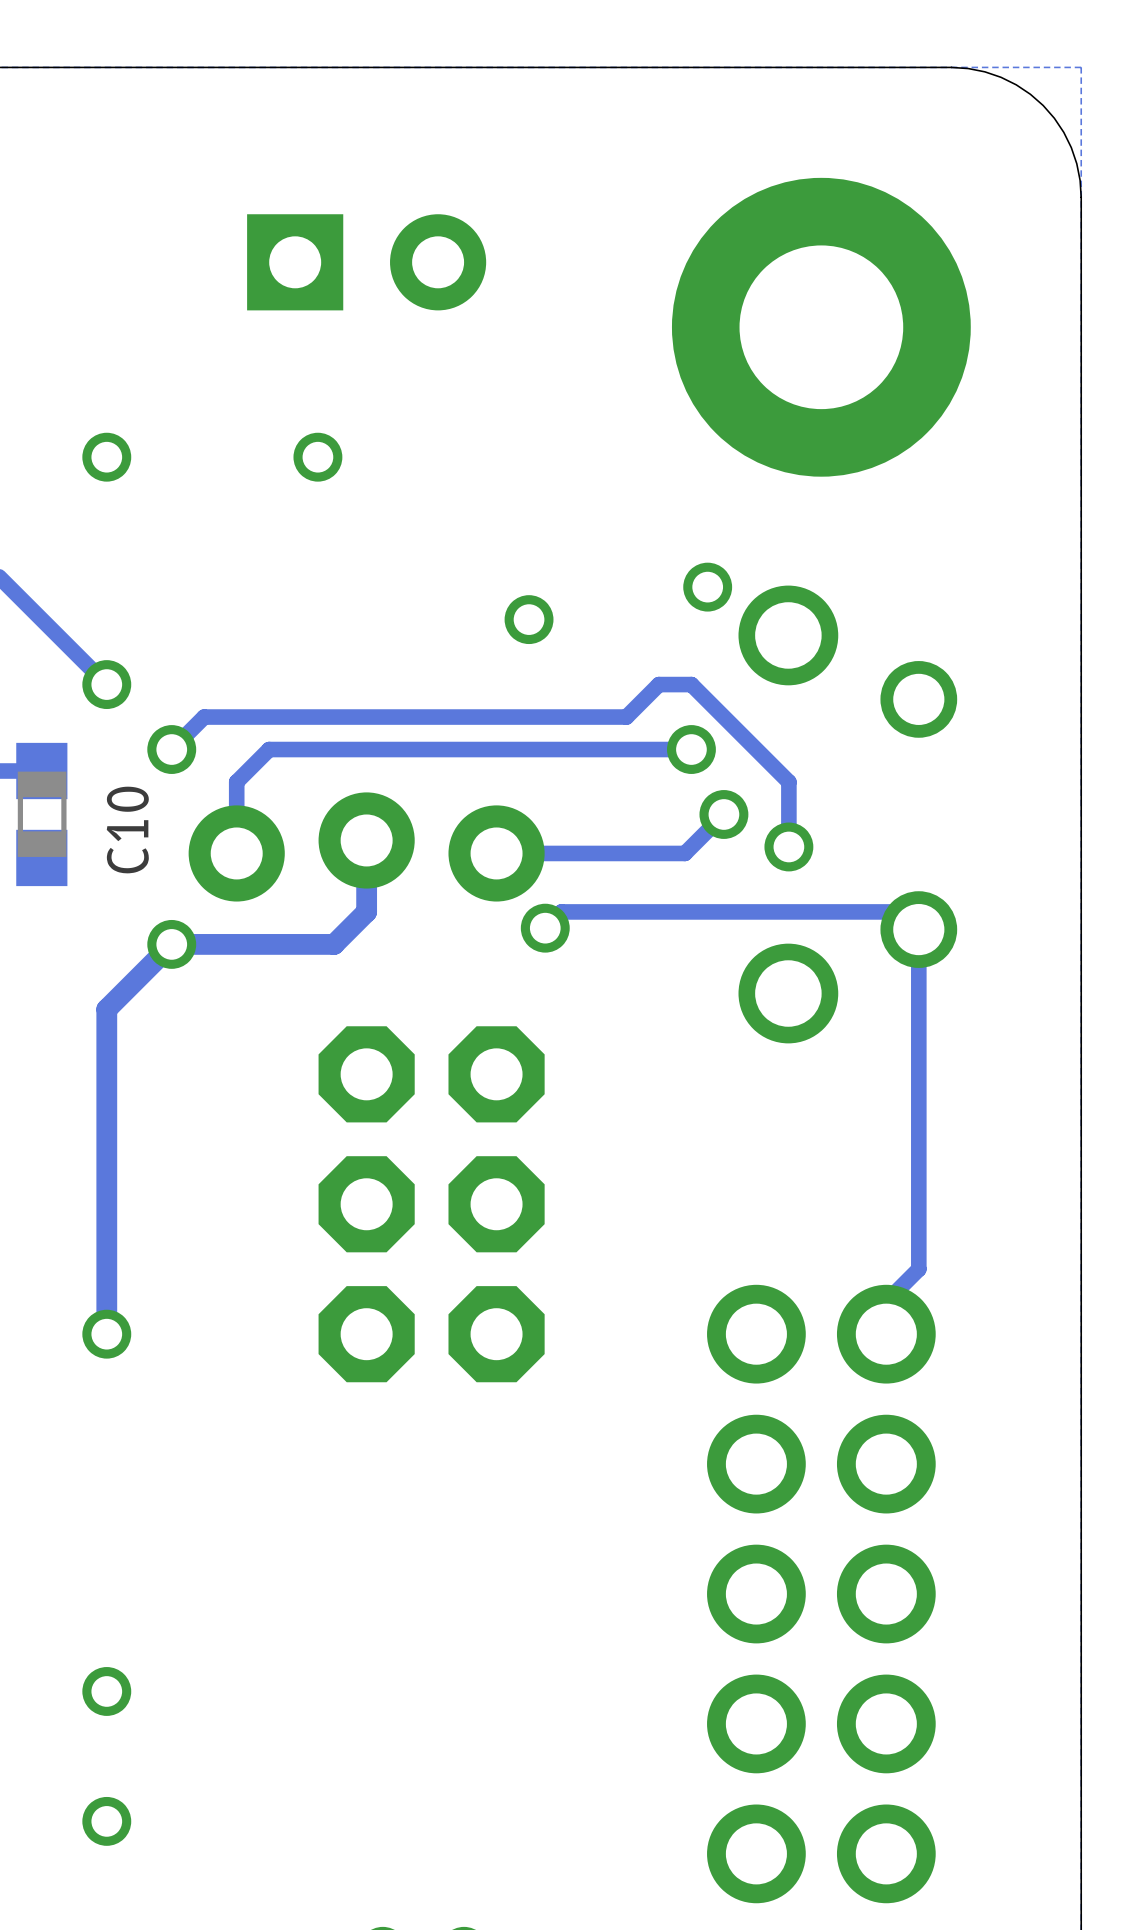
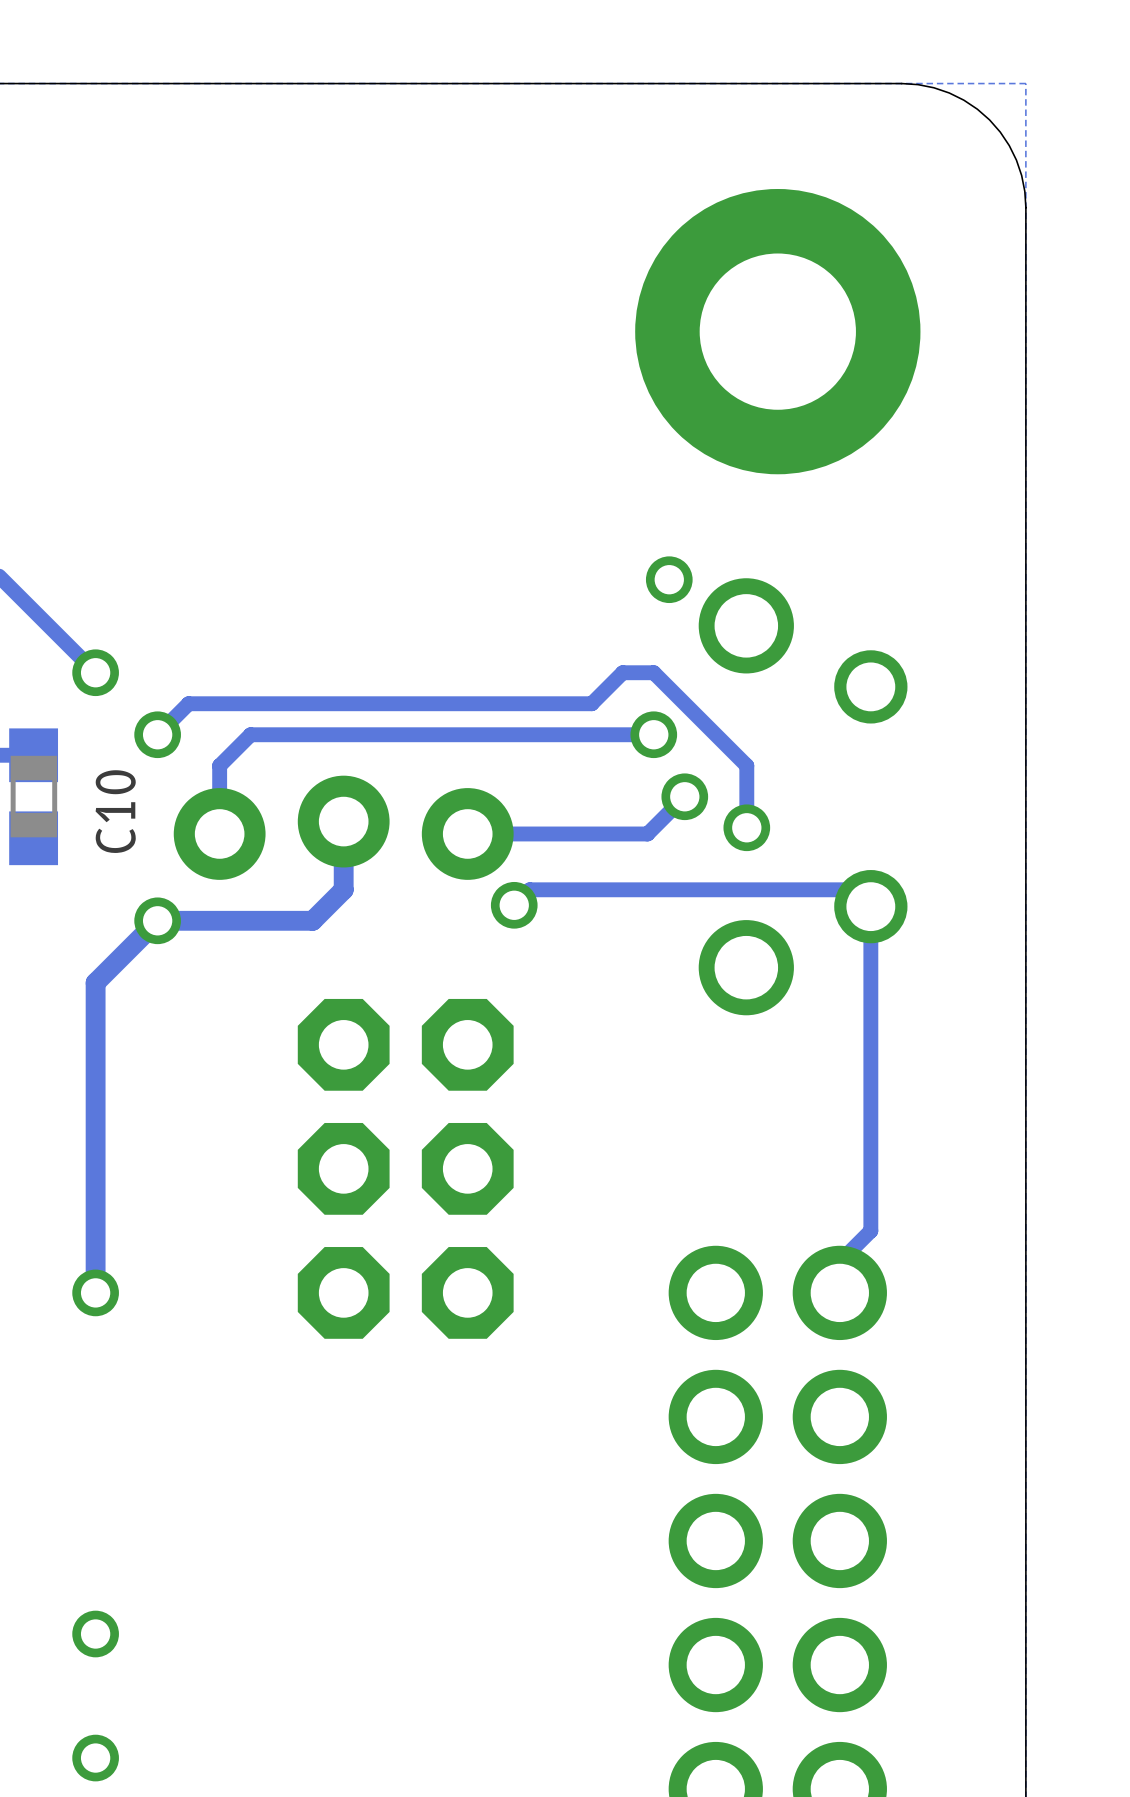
part: (366, 262) -> none
via: (106, 457) -> none
via: (317, 457) -> none
via: (529, 619) -> none

